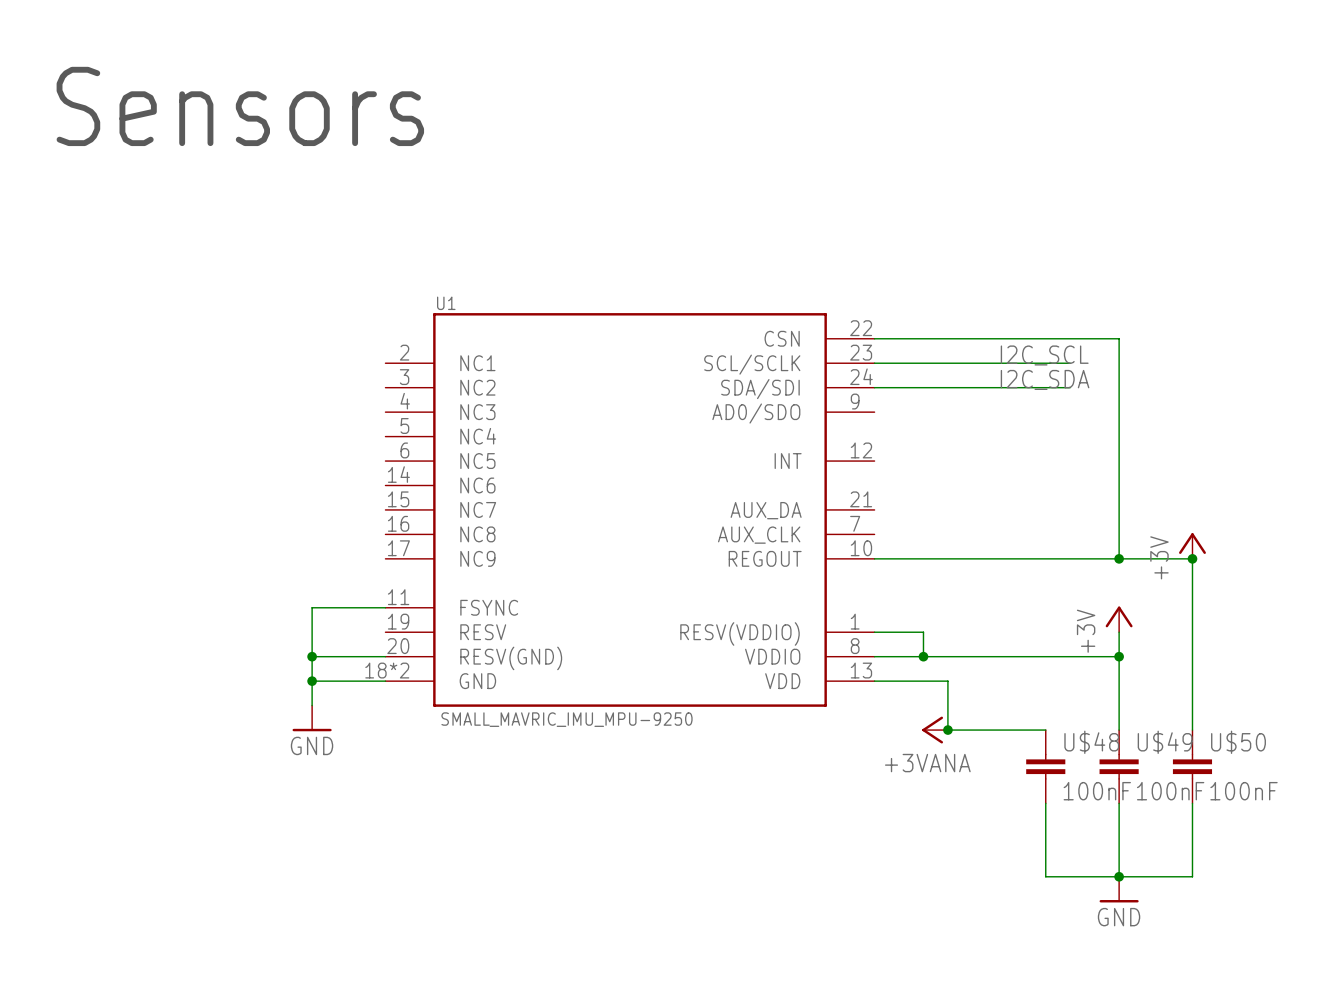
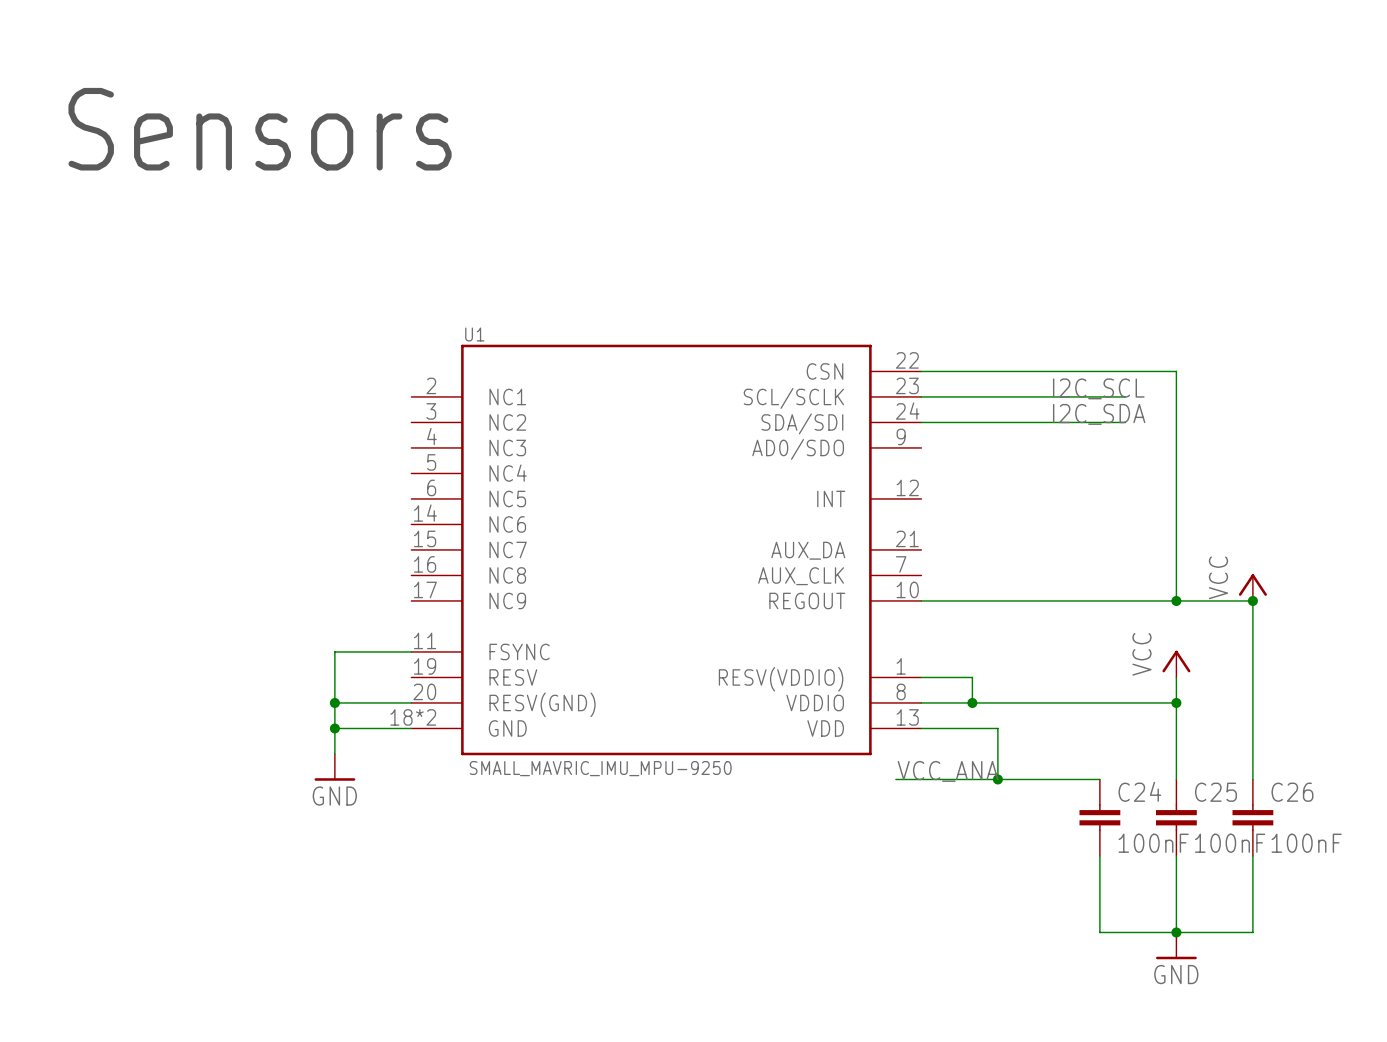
power symbol: +3V (1192, 546) -> VCC (1252, 587)
power symbol: +3V (1119, 619) -> VCC (1176, 664)
label: none -> VCC_ANA (948, 771)
wire: none -> (895, 779) (997, 779)
power symbol: +3VANA (935, 730) -> none
U$48 name: U$48 (1091, 742) -> C24 (1139, 791)
U$49 name: U$49 (1165, 742) -> C25 (1215, 792)
U$50 name: U$50 (1238, 742) -> C26 (1292, 792)

